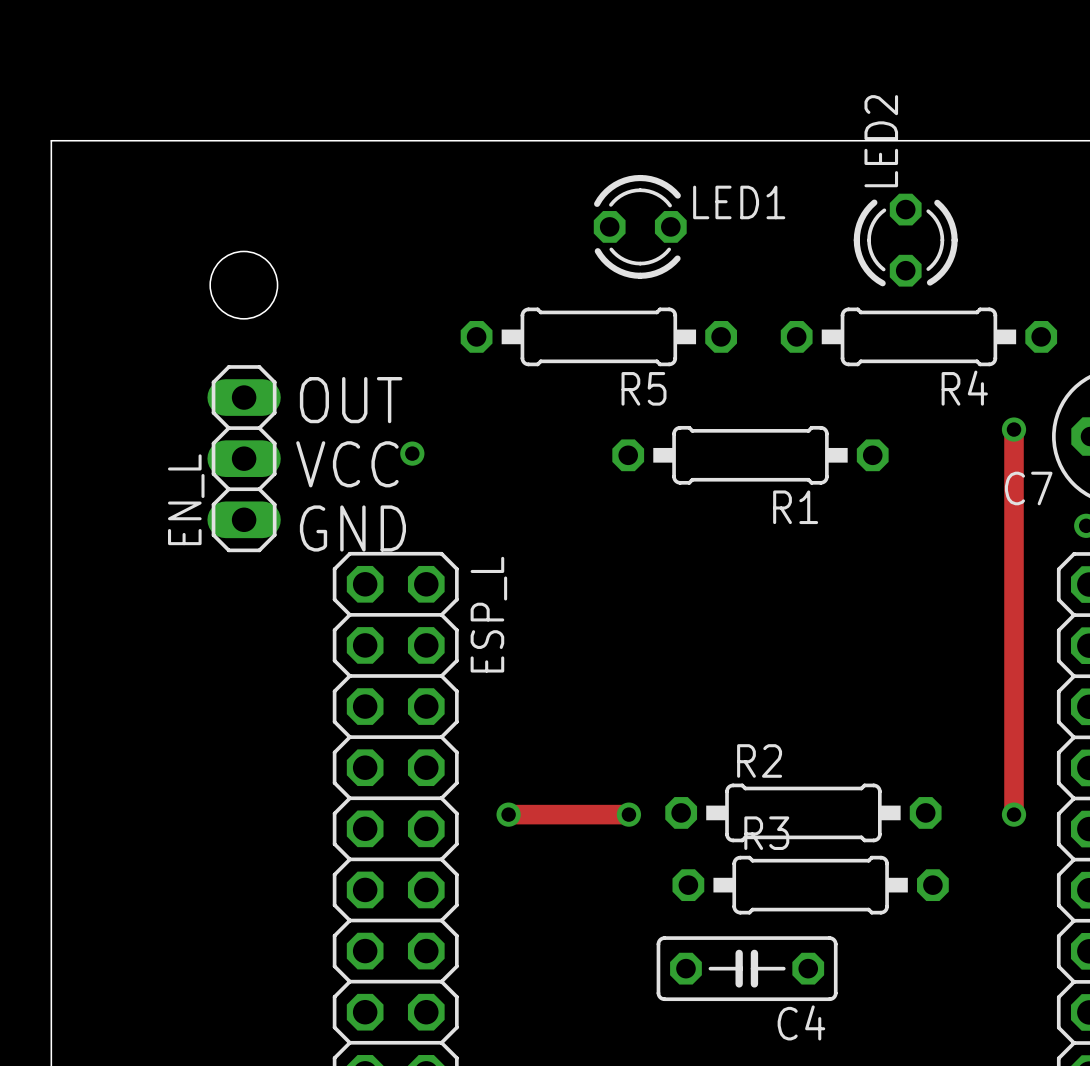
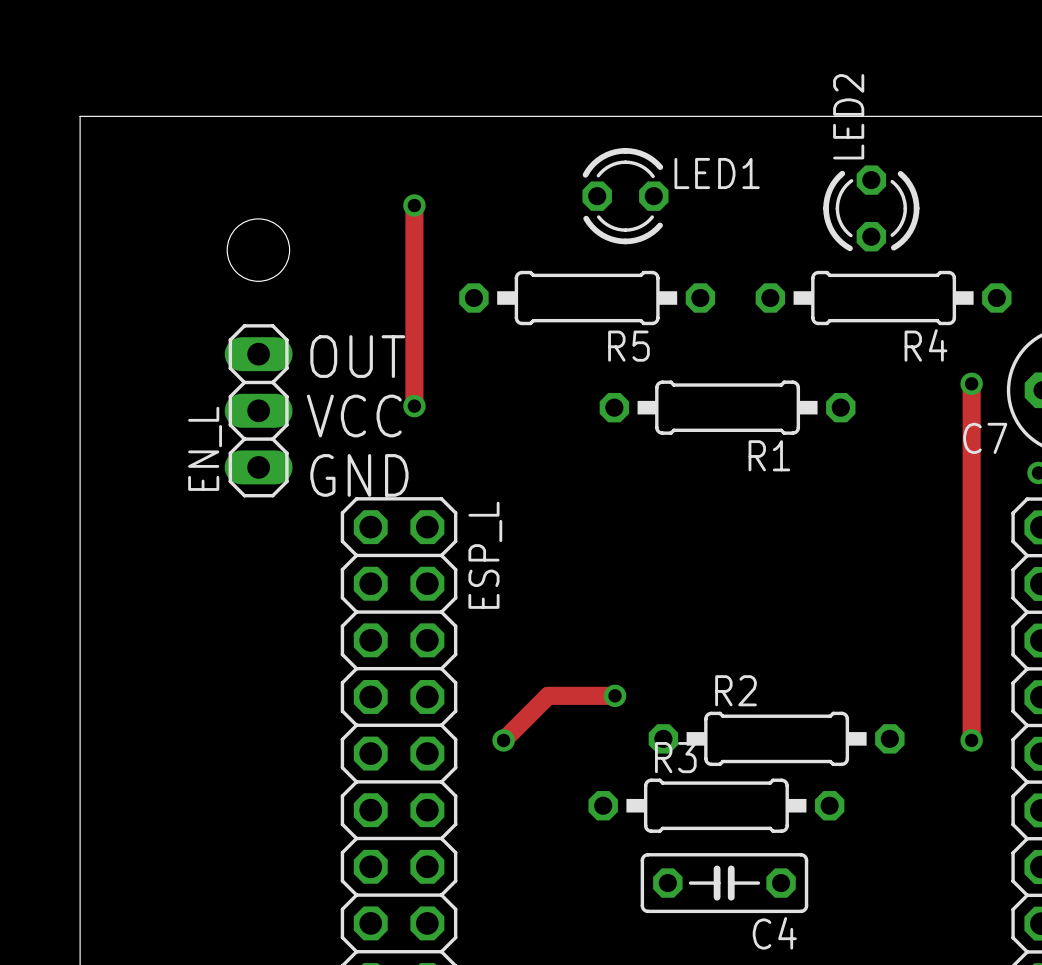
track: none -> (414, 205) (414, 406)
via: none -> (414, 205)
track: (508, 814) (628, 814) -> (503, 740) (548, 695) (615, 695)
via position: (628, 814) -> (615, 695)
R3 position: (810, 885) -> (716, 805)

